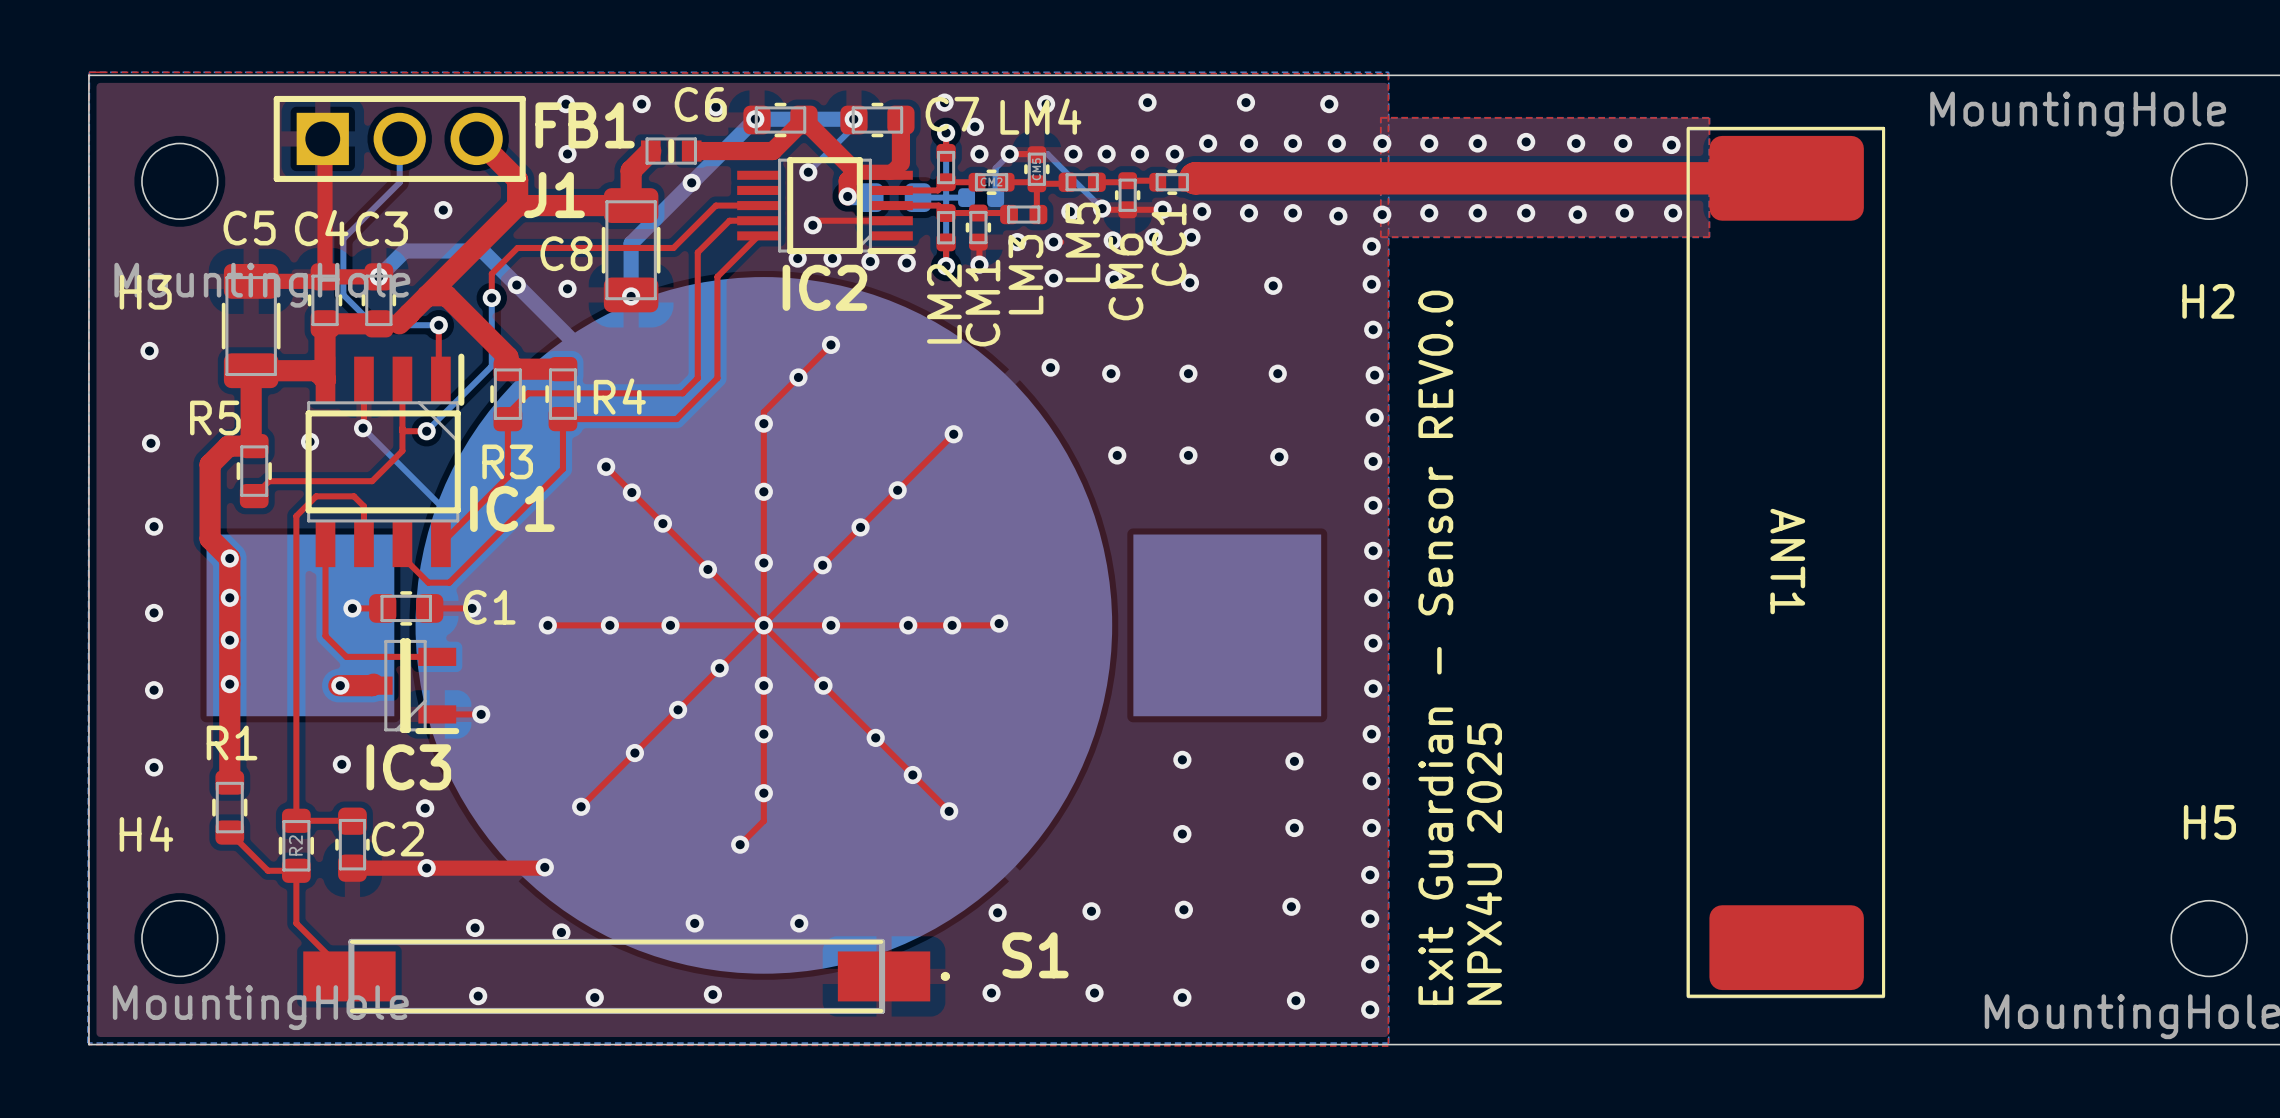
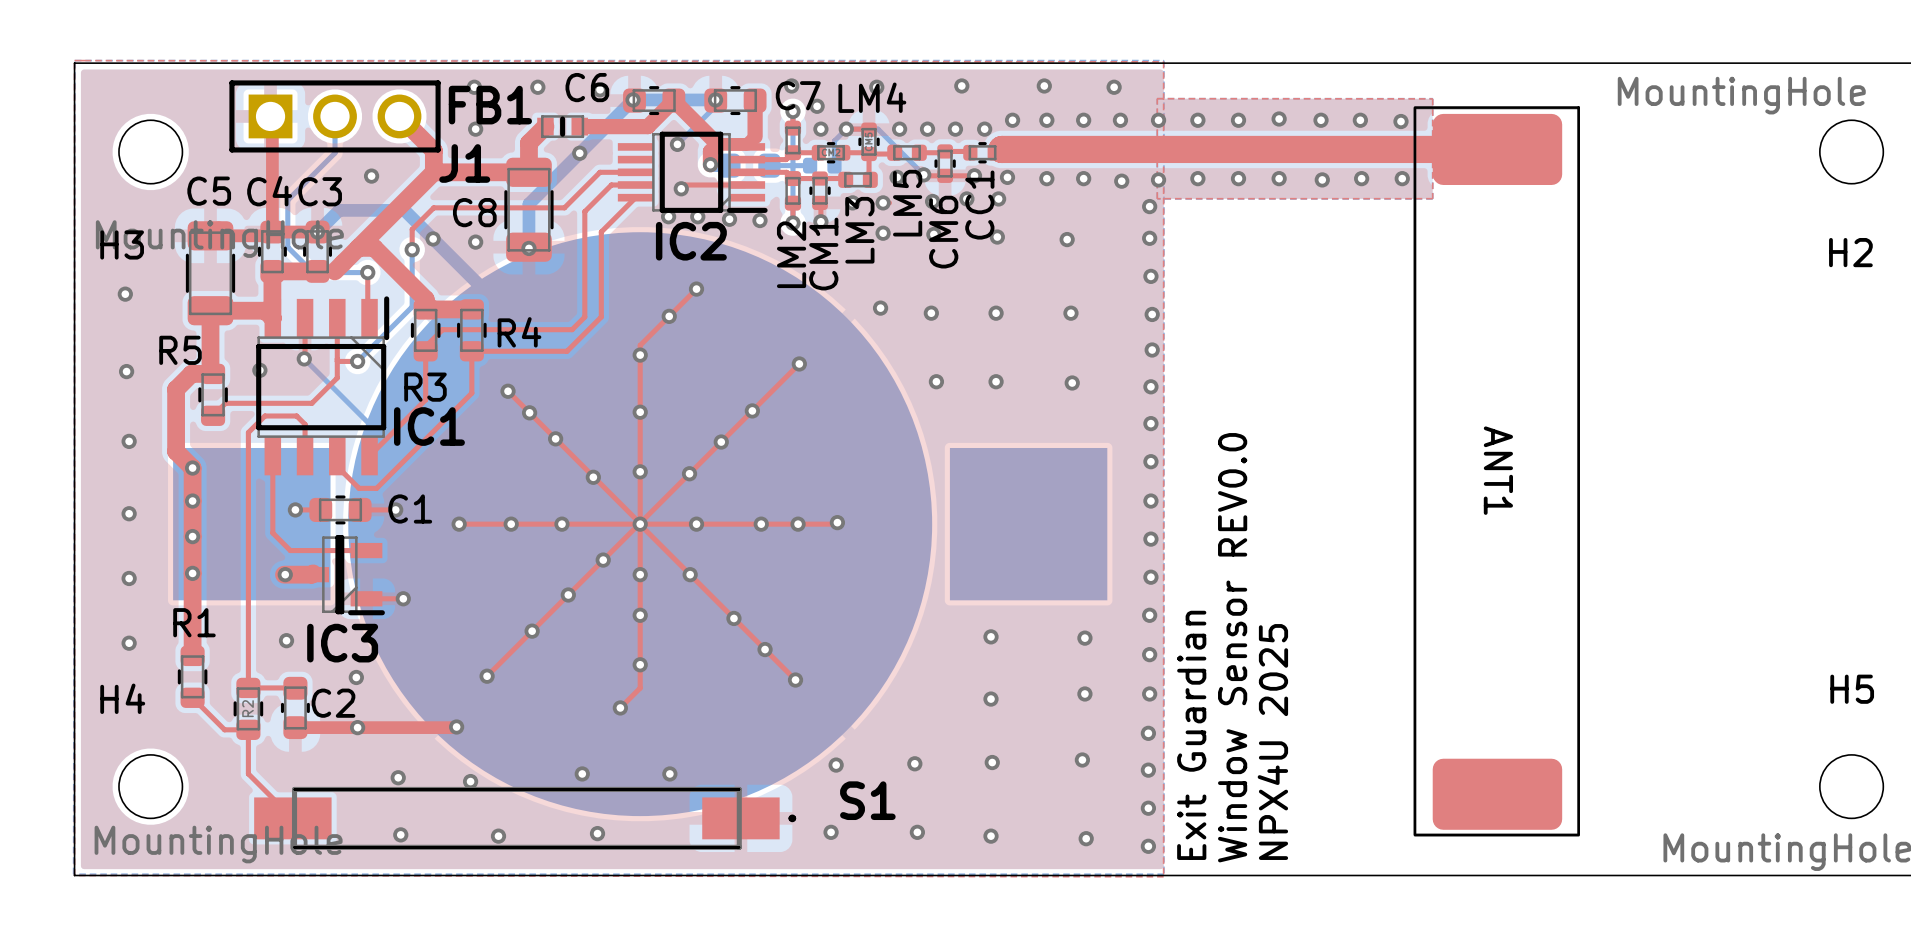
text: Exit Guardian - Sensor REV0.0 (1435, 647) -> none
text: none -> Window Sensor REV0.0 (1232, 647)
text position: NPX4U 2025 (1483, 864) -> NPX4U 2025 (1272, 742)
text: none -> Exit Guardian (1191, 735)

